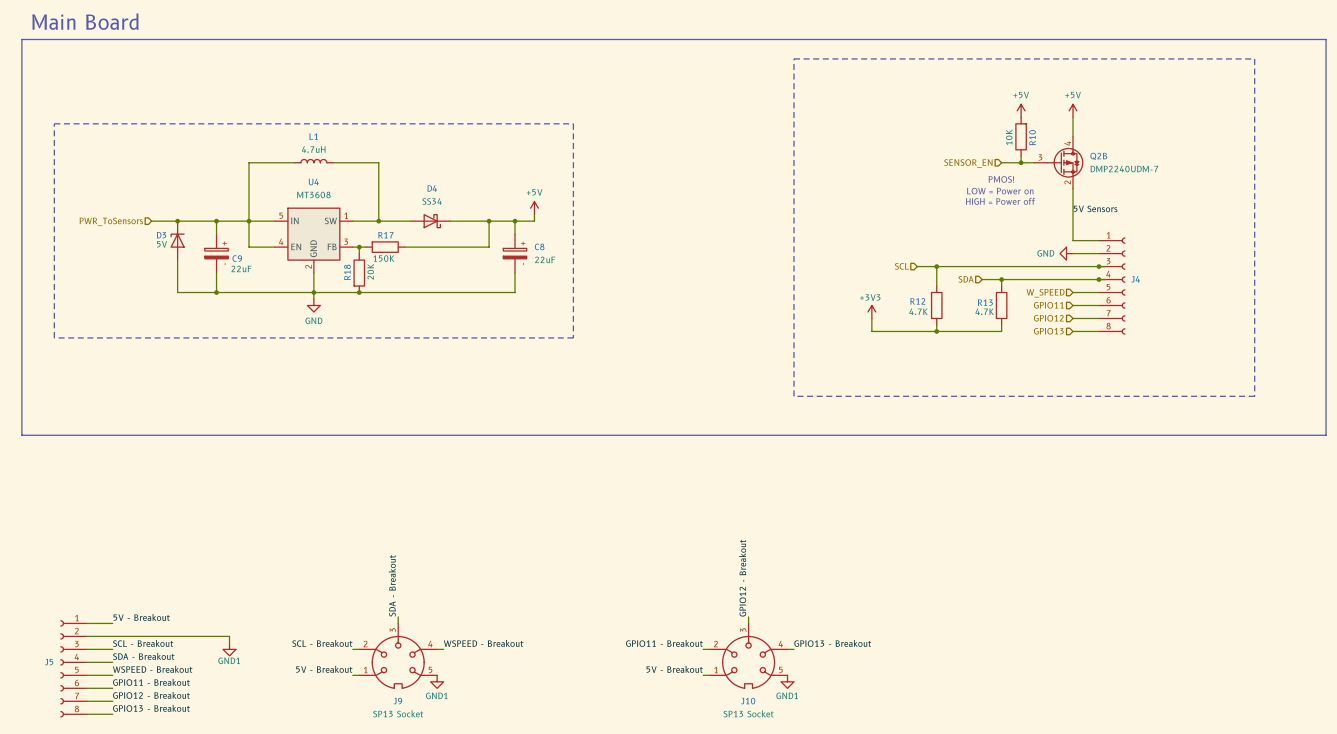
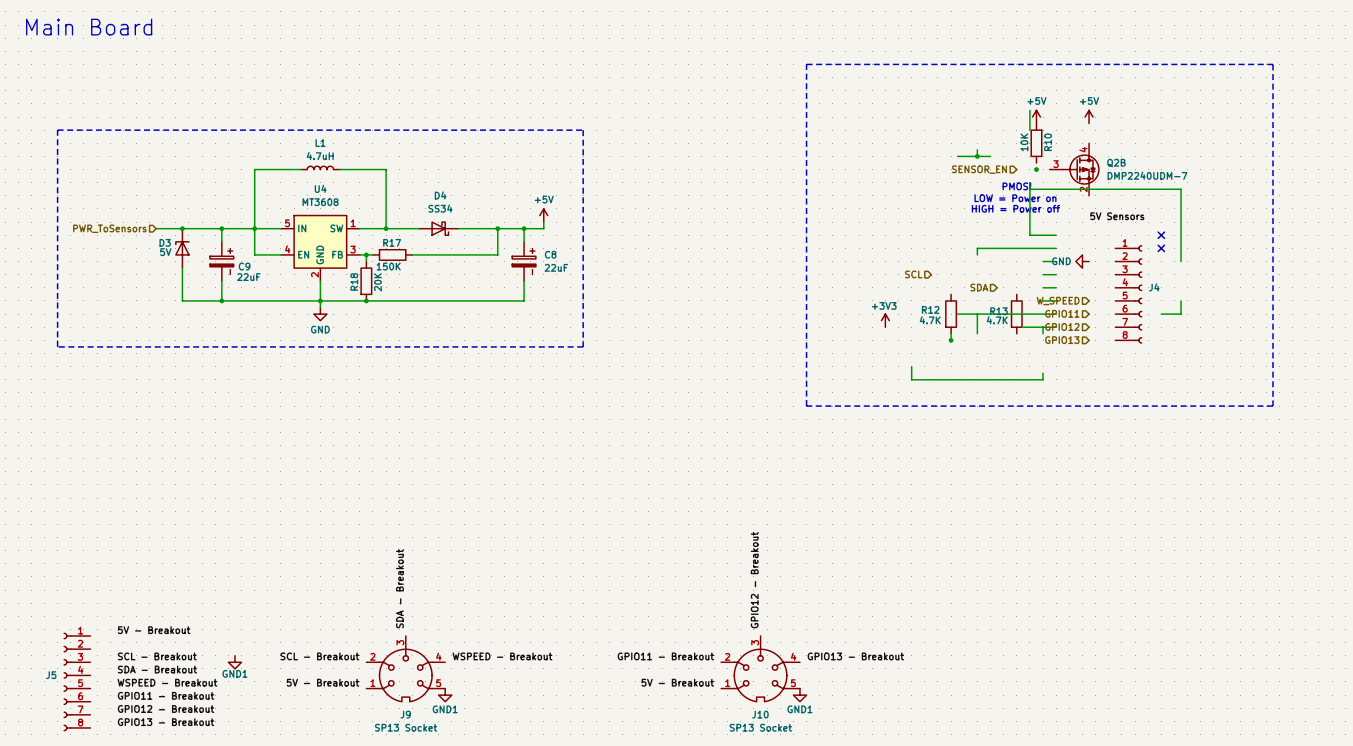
line: (21, 39) (1326, 39) (1326, 435) (21, 435) (21, 39) -> none
wire: (1073, 117) (1073, 136) -> (1029, 110) (1029, 130)
junction: none -> (977, 156)
wire: (1021, 156) (1021, 162) -> (977, 149) (977, 156)
wire: (1001, 162) (1034, 162) -> (957, 156) (990, 156)
wire: none -> (1029, 189) (1181, 189) (1181, 261)
wire: (1073, 188) (1073, 240) (1098, 240) -> (1029, 182) (1029, 235) (1056, 235)
no-connect mark: none -> (1161, 235)
wire: none -> (1056, 248) (977, 248) (977, 254)
no-connect mark: none -> (1161, 248)
wire: none -> (1043, 261) (1056, 261)
wire: (1073, 253) (1098, 253) -> none
wire: (917, 266) (1027, 266) -> none
wire: (936, 266) (936, 286) -> (977, 314) (977, 333)
junction: (936, 266) -> none
wire: (1040, 266) (1105, 266) -> none
junction: (1098, 266) -> none
wire: (982, 279) (1027, 279) -> none
wire: (1001, 279) (1001, 286) -> (1043, 327) (1043, 333)
junction: (1001, 279) -> none
wire: (1040, 279) (1105, 279) -> none
junction: (1098, 279) -> none
wire: none -> (1043, 300) (1056, 300)
wire: (1073, 292) (1098, 292) -> none
wire: none -> (1181, 300) (1181, 314) (1161, 314)
wire: none -> (957, 314) (1056, 314)
wire: (1073, 305) (1098, 305) -> none
wire: (871, 318) (871, 331) (1001, 331) (1001, 324) -> (911, 366) (911, 379) (1043, 379) (1043, 373)
wire: none -> (1023, 327) (1056, 327)
wire: (1073, 318) (1098, 318) -> none
wire: (1073, 331) (1098, 331) -> none
wire: (398, 616) (398, 623) -> none
wire: (748, 616) (748, 623) -> none
wire: (86, 623) (112, 623) -> none
wire: (86, 636) (229, 636) (229, 642) -> none
wire: (86, 649) (112, 649) -> none
wire: (352, 649) (359, 649) -> none
wire: (437, 649) (443, 649) -> none
wire: (703, 649) (709, 649) -> none
wire: (787, 649) (794, 649) -> none
wire: (86, 662) (112, 662) -> none
wire: (86, 675) (112, 675) -> none
wire: (352, 675) (359, 675) -> none
wire: (703, 675) (709, 675) -> none
wire: (86, 688) (112, 688) -> none
wire: (86, 701) (112, 701) -> none
wire: (86, 714) (112, 714) -> none

